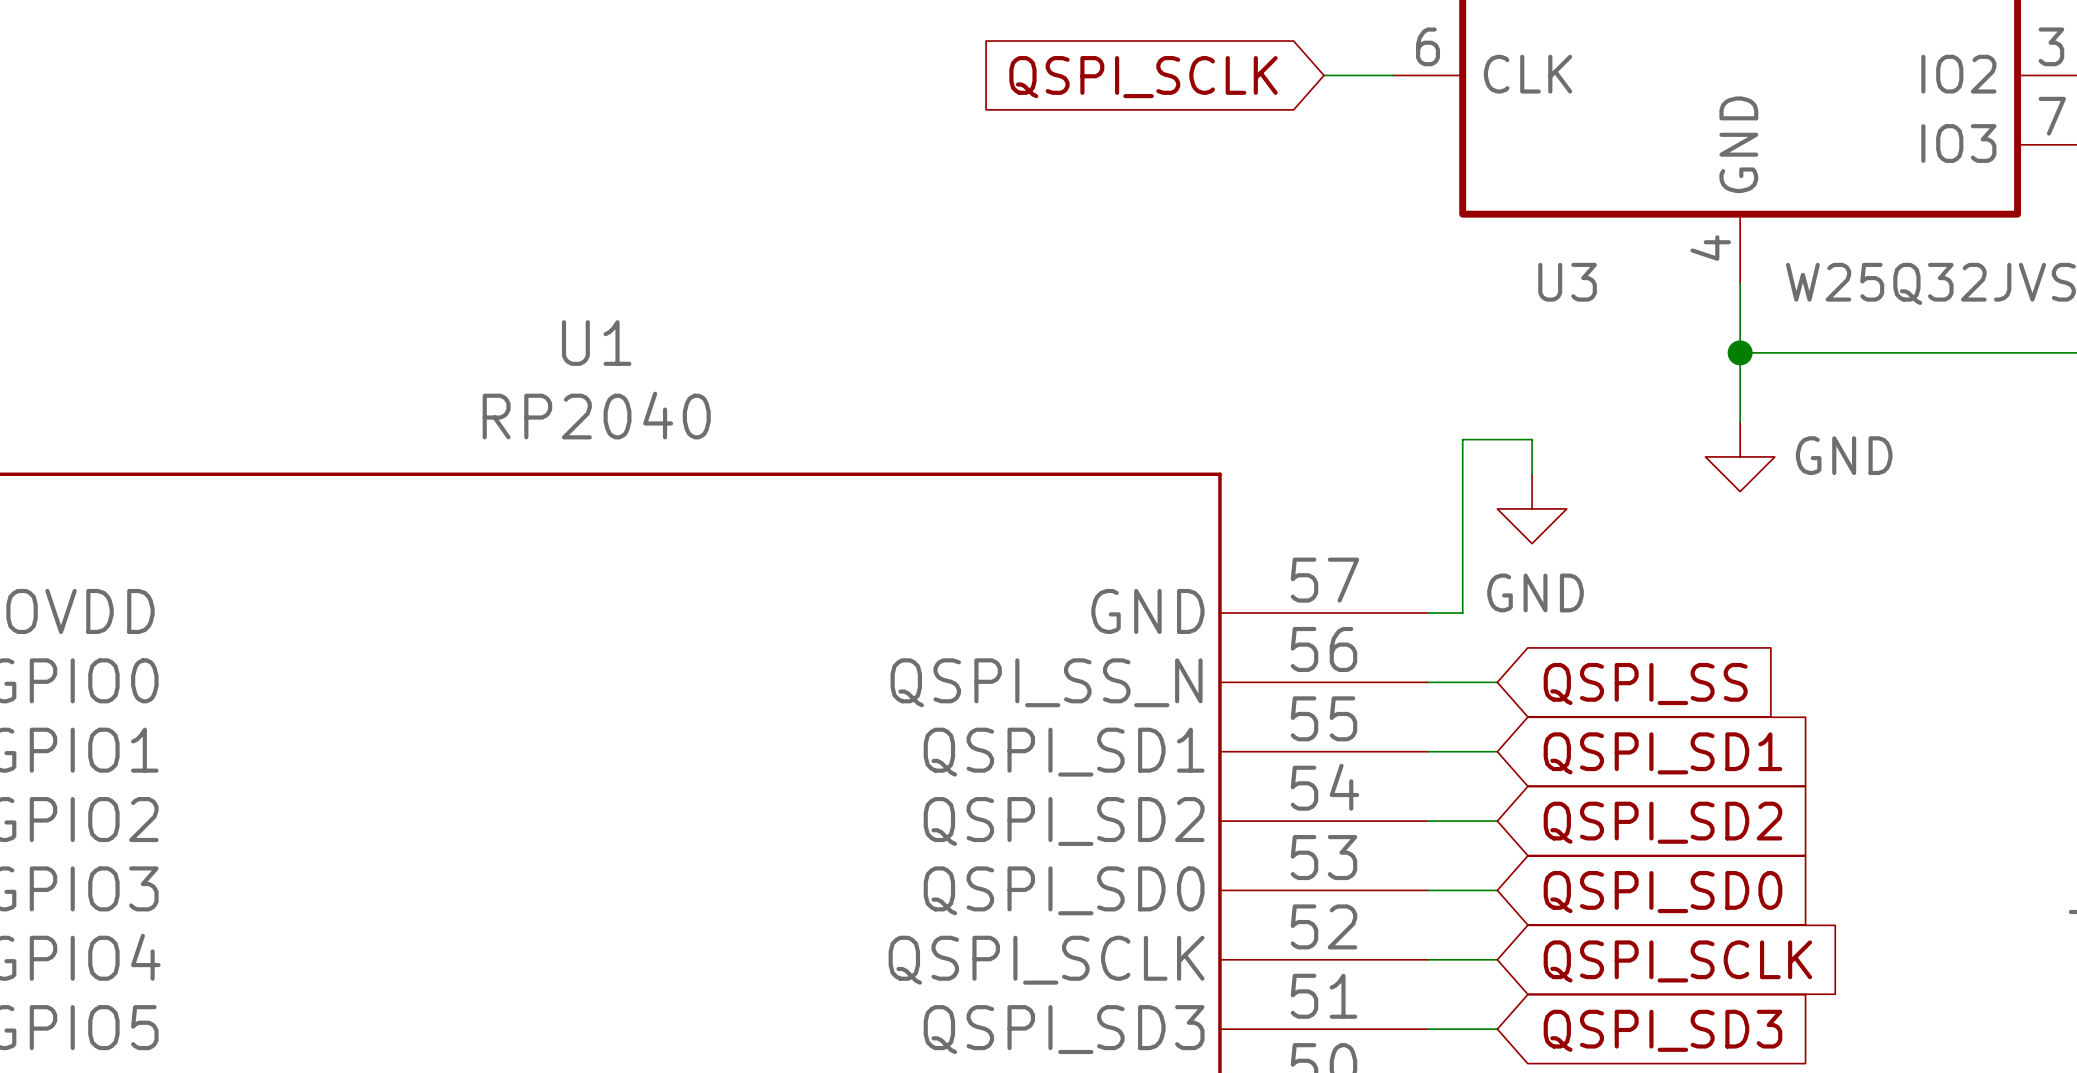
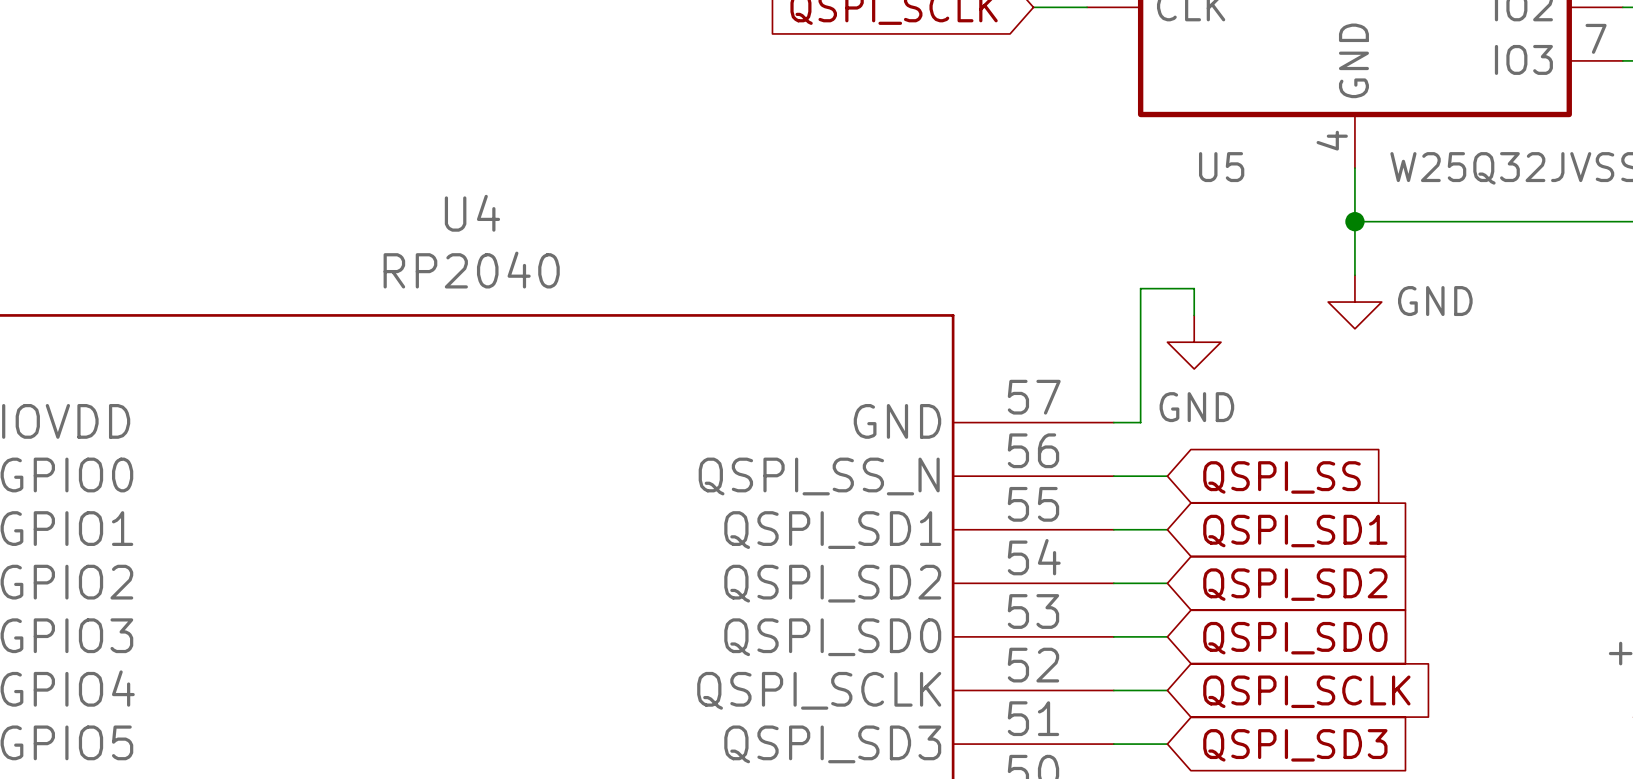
U3 name: U3 (1567, 282) -> U5 (1221, 167)
U1 name: U1 (596, 343) -> U4 (472, 213)

